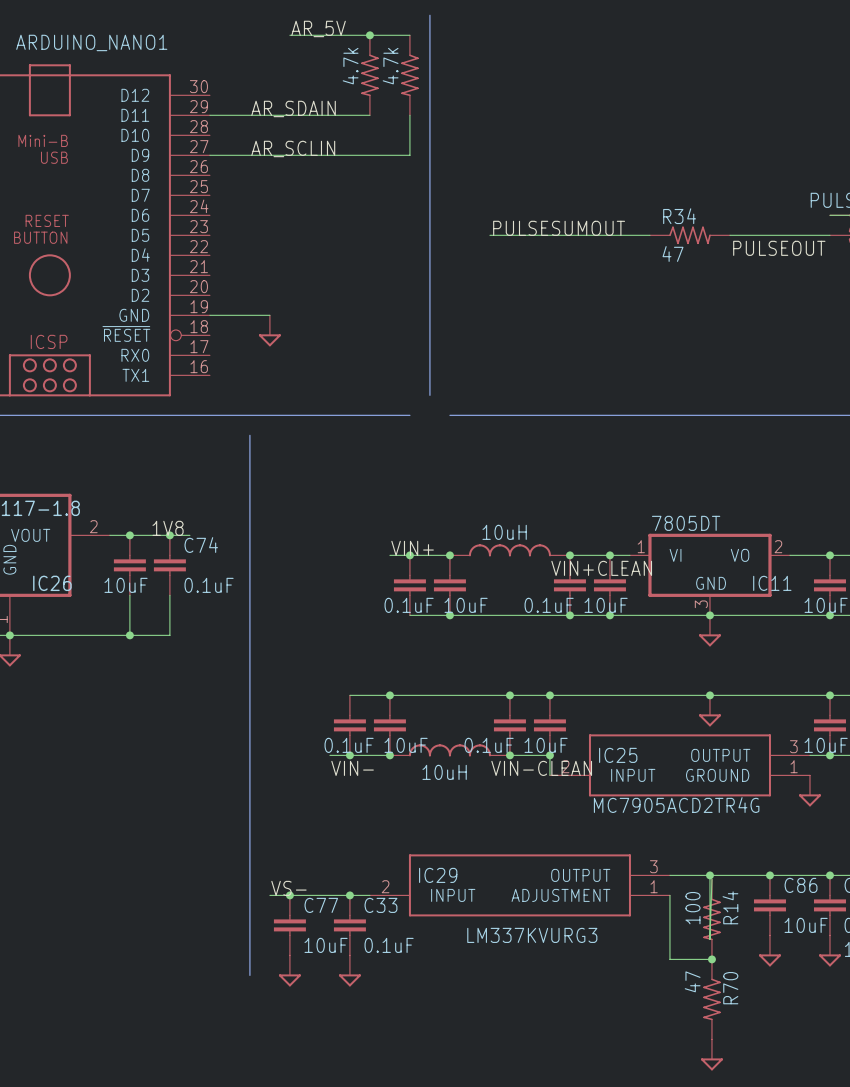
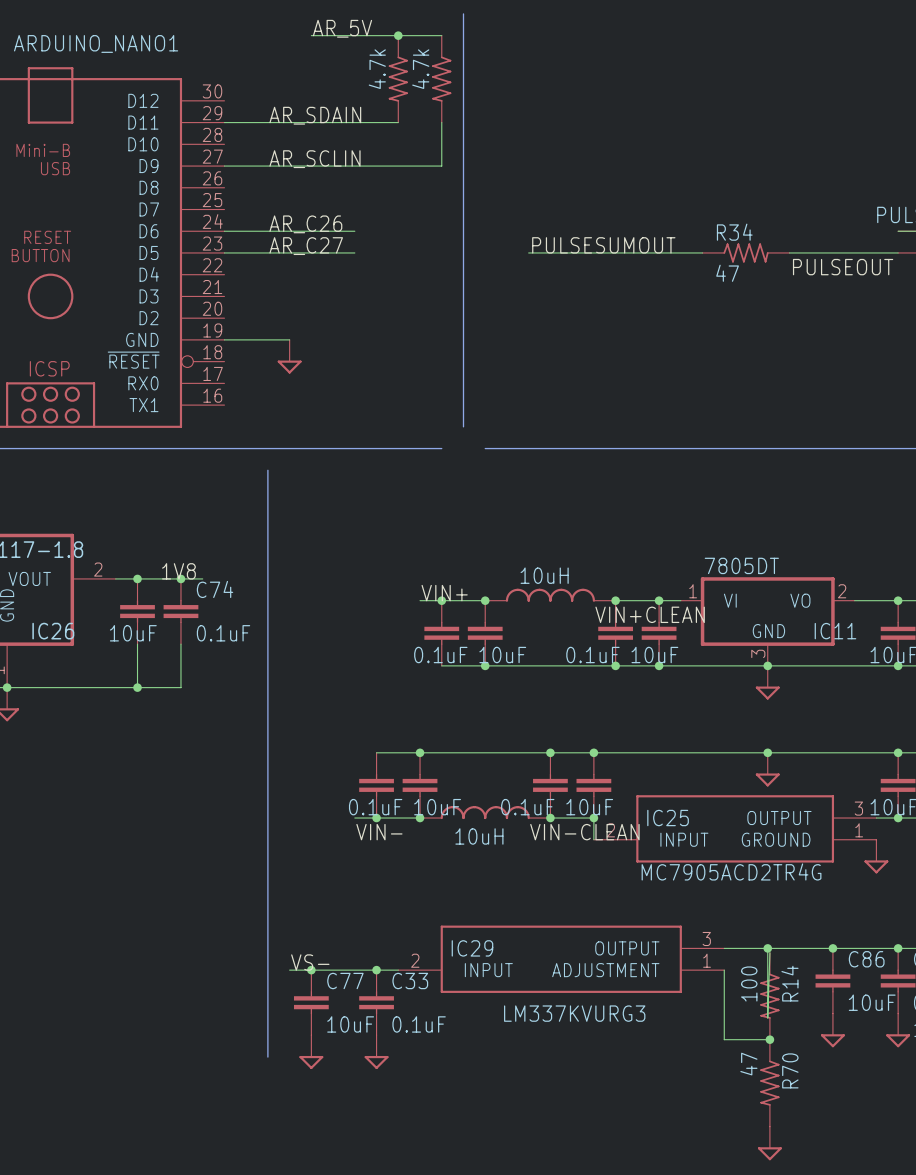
label: none -> AR_C26 (305, 224)
wire: none -> (224, 231) (354, 231)
label: none -> AR_C27 (306, 246)
wire: none -> (224, 252) (354, 252)

